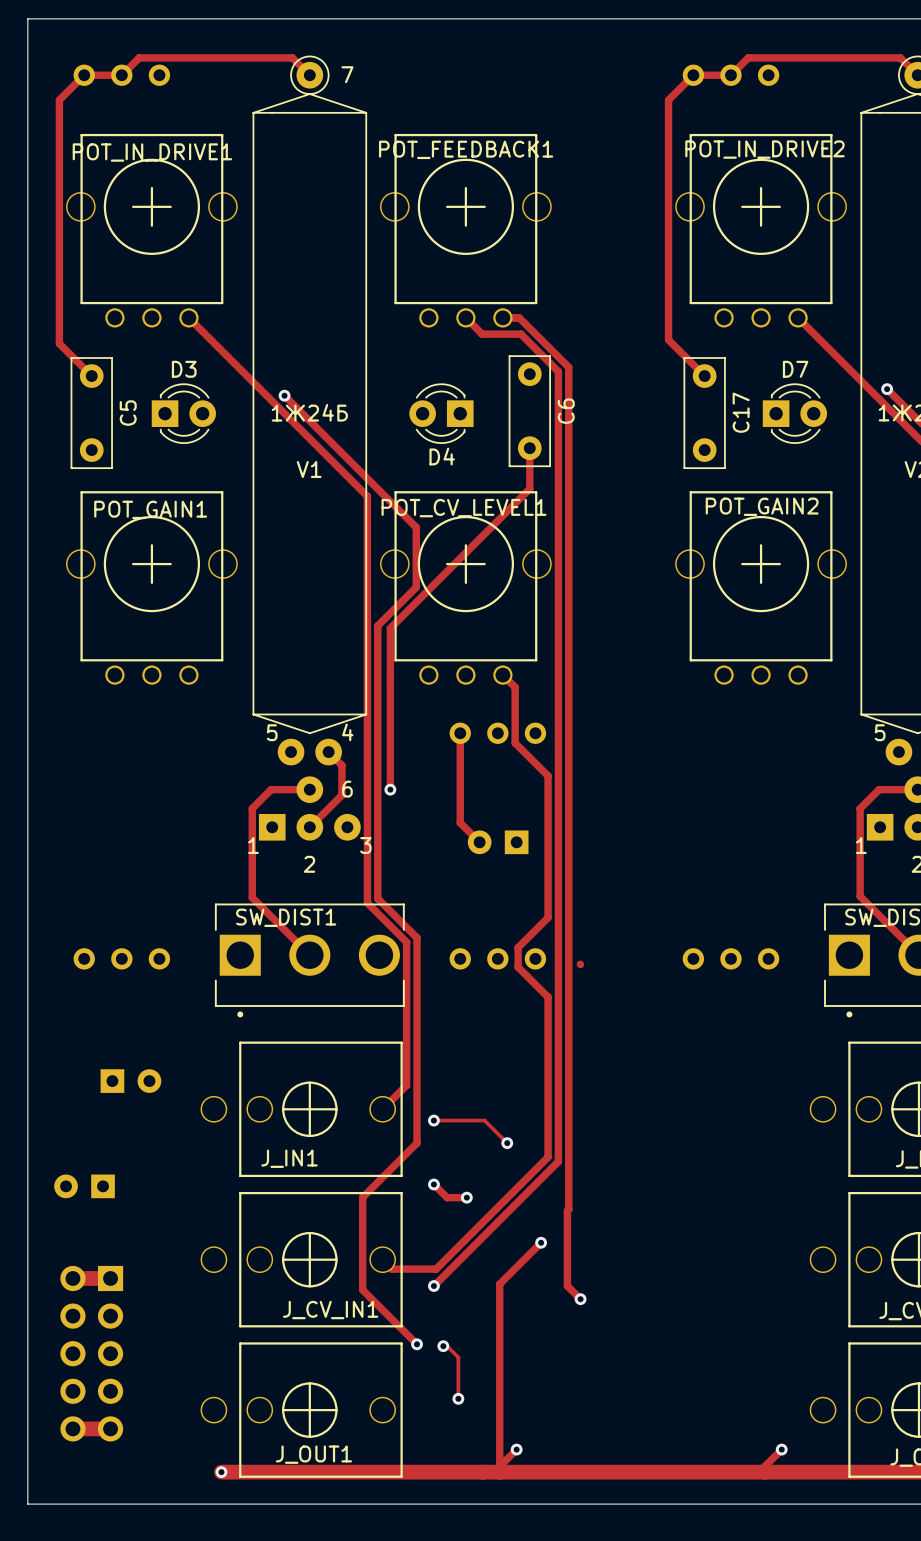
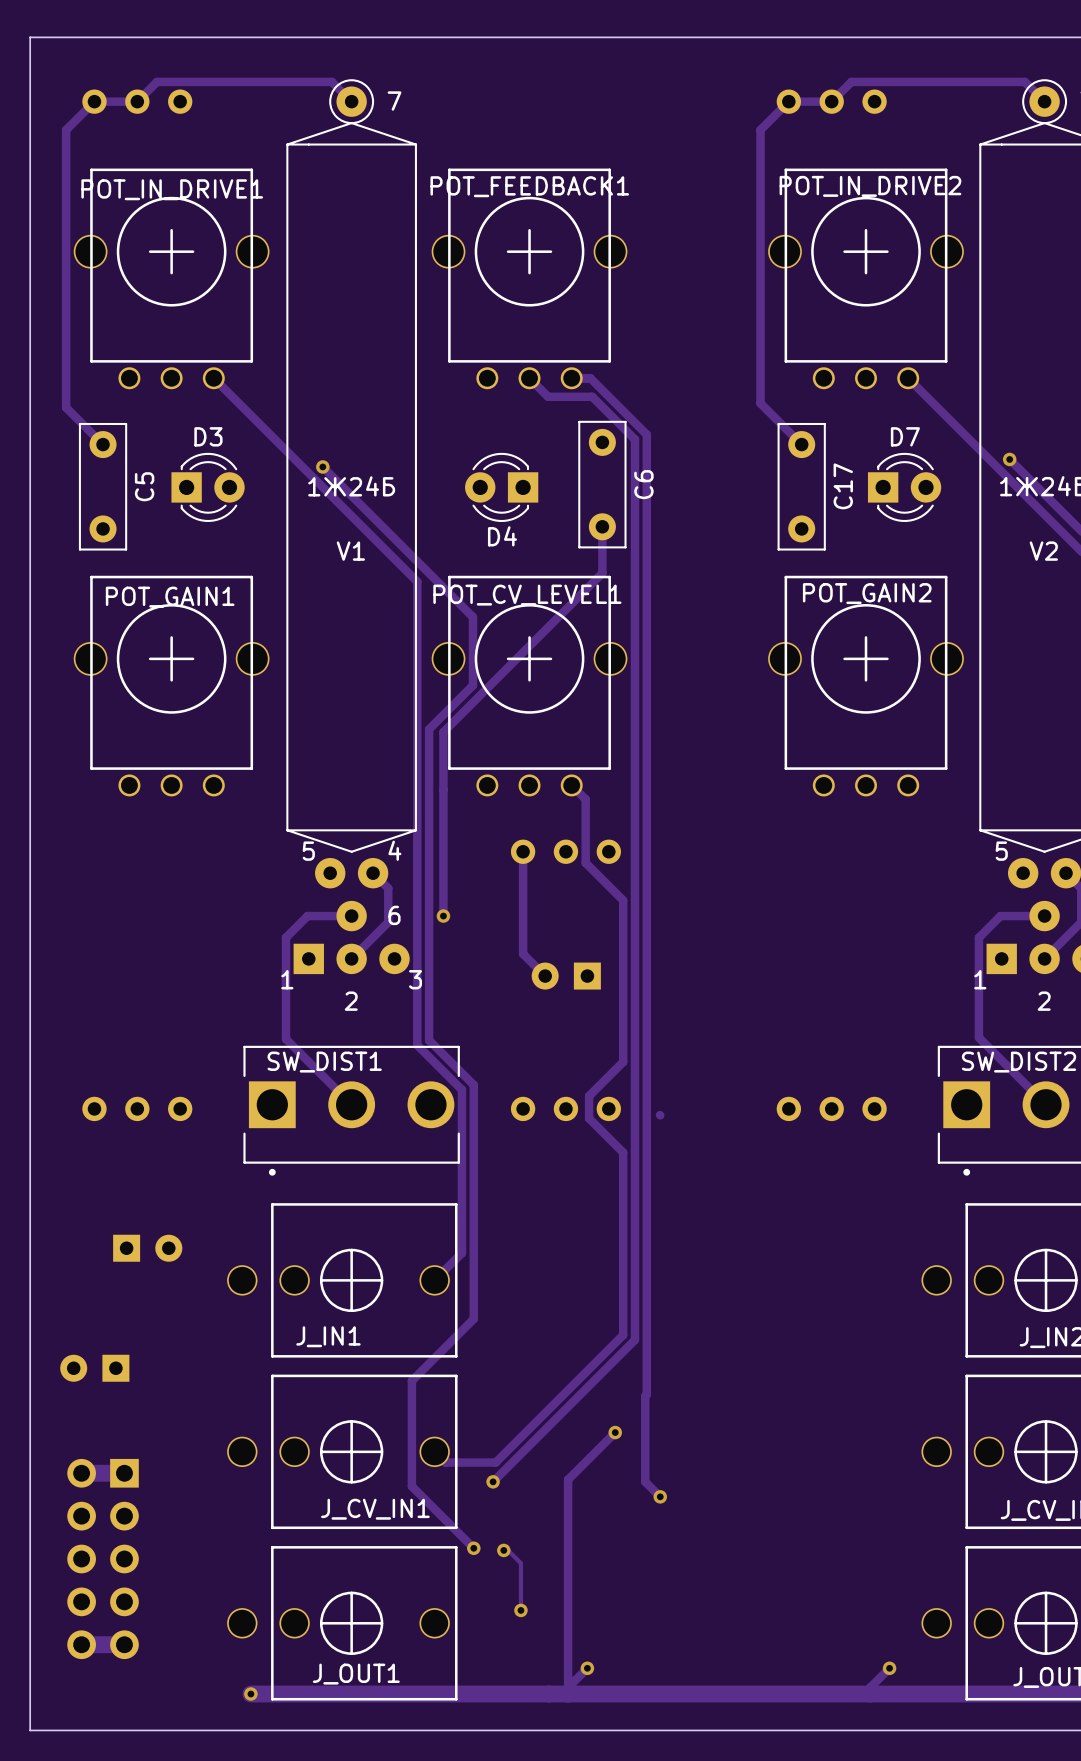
track: (433, 1120) (484, 1120) (507, 1143) -> none
via: (433, 1120) -> none
via: (507, 1143) -> none
track: (433, 1184) (447, 1197) (466, 1197) -> none
via: (433, 1184) -> none
via: (466, 1197) -> none

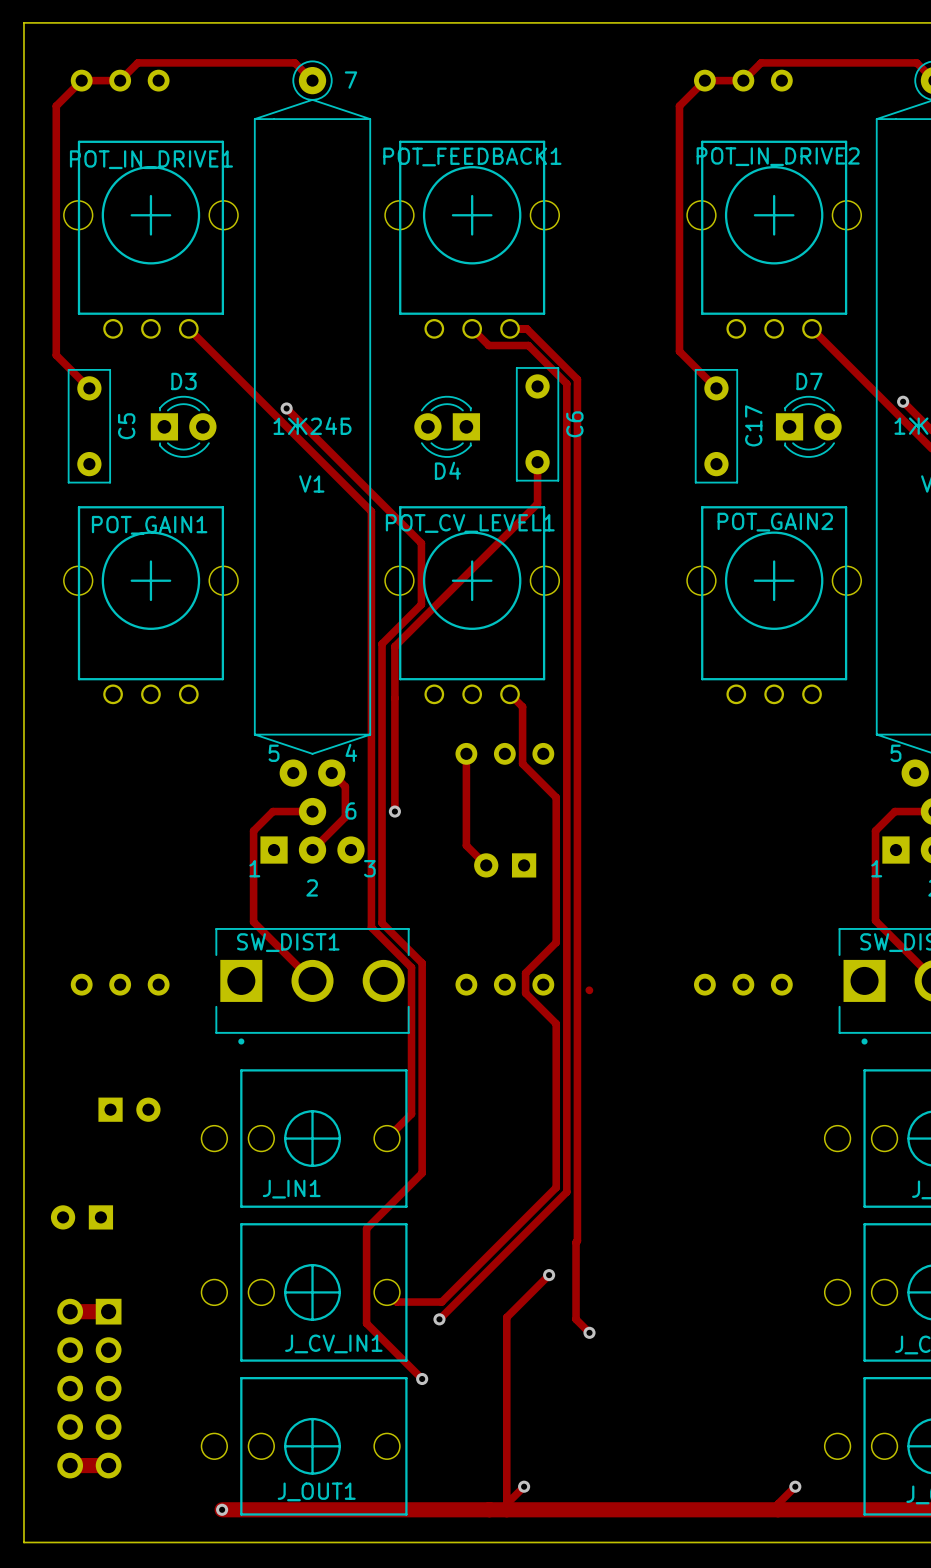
track: (503, 1550) (508, 1550) (520, 1563) (520, 1610) -> none
via: (503, 1550) -> none
via: (520, 1610) -> none

